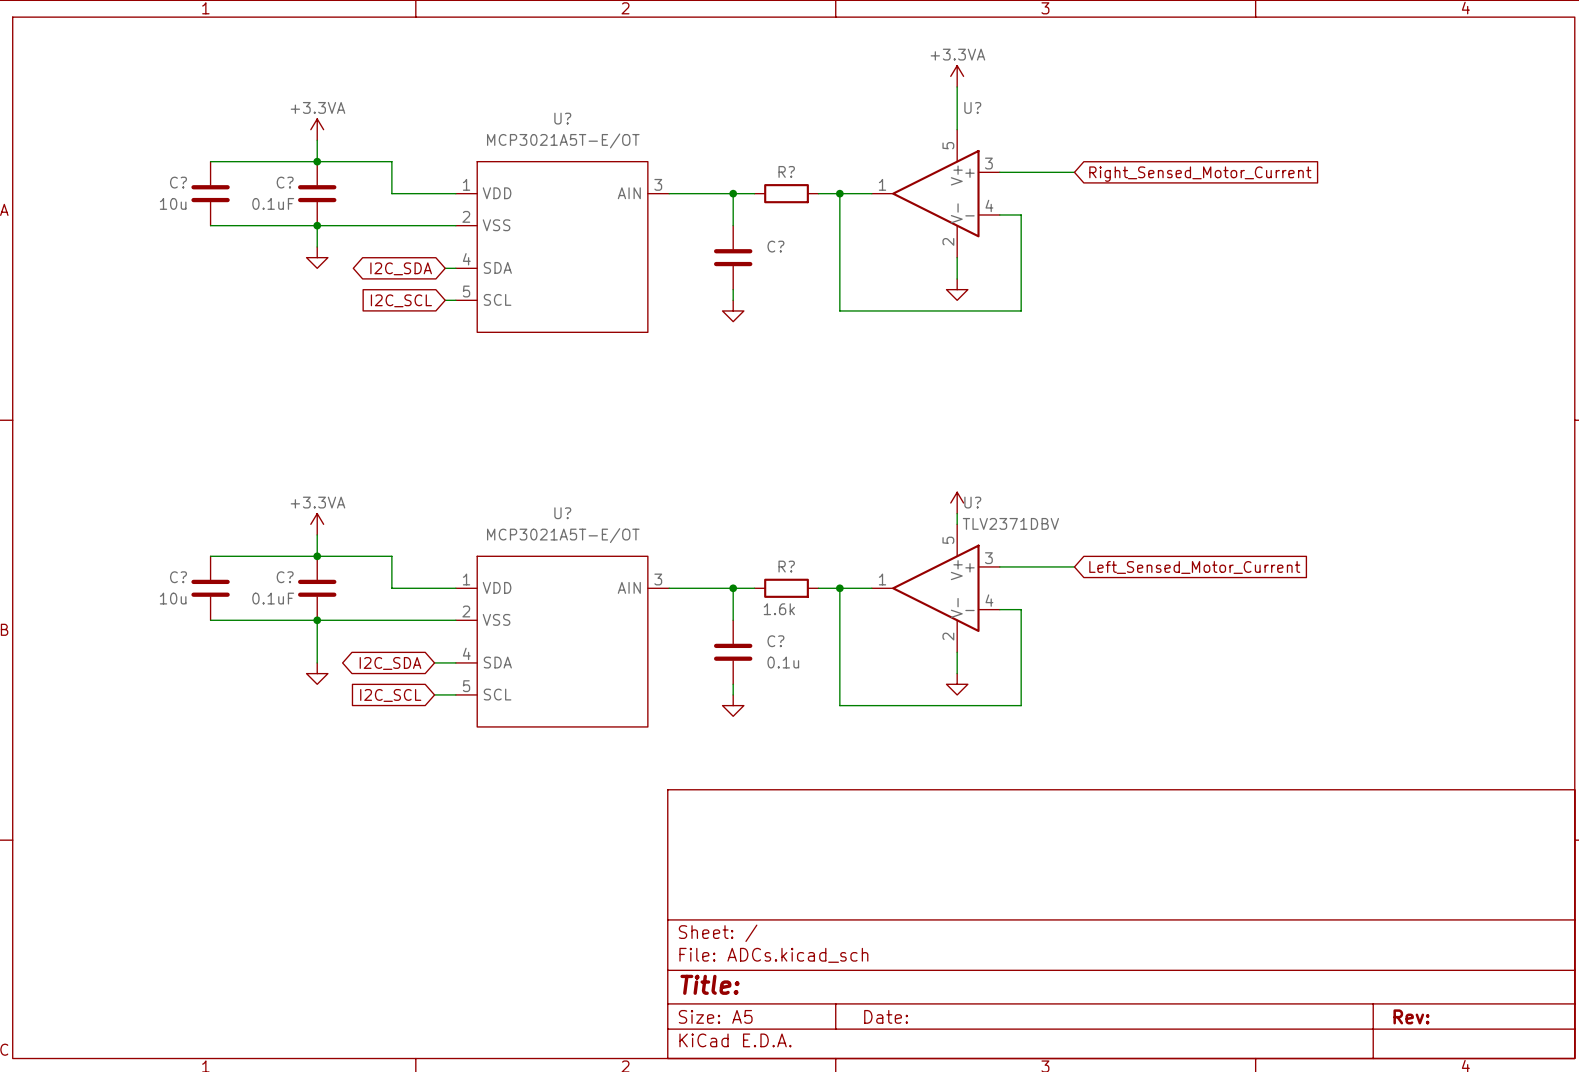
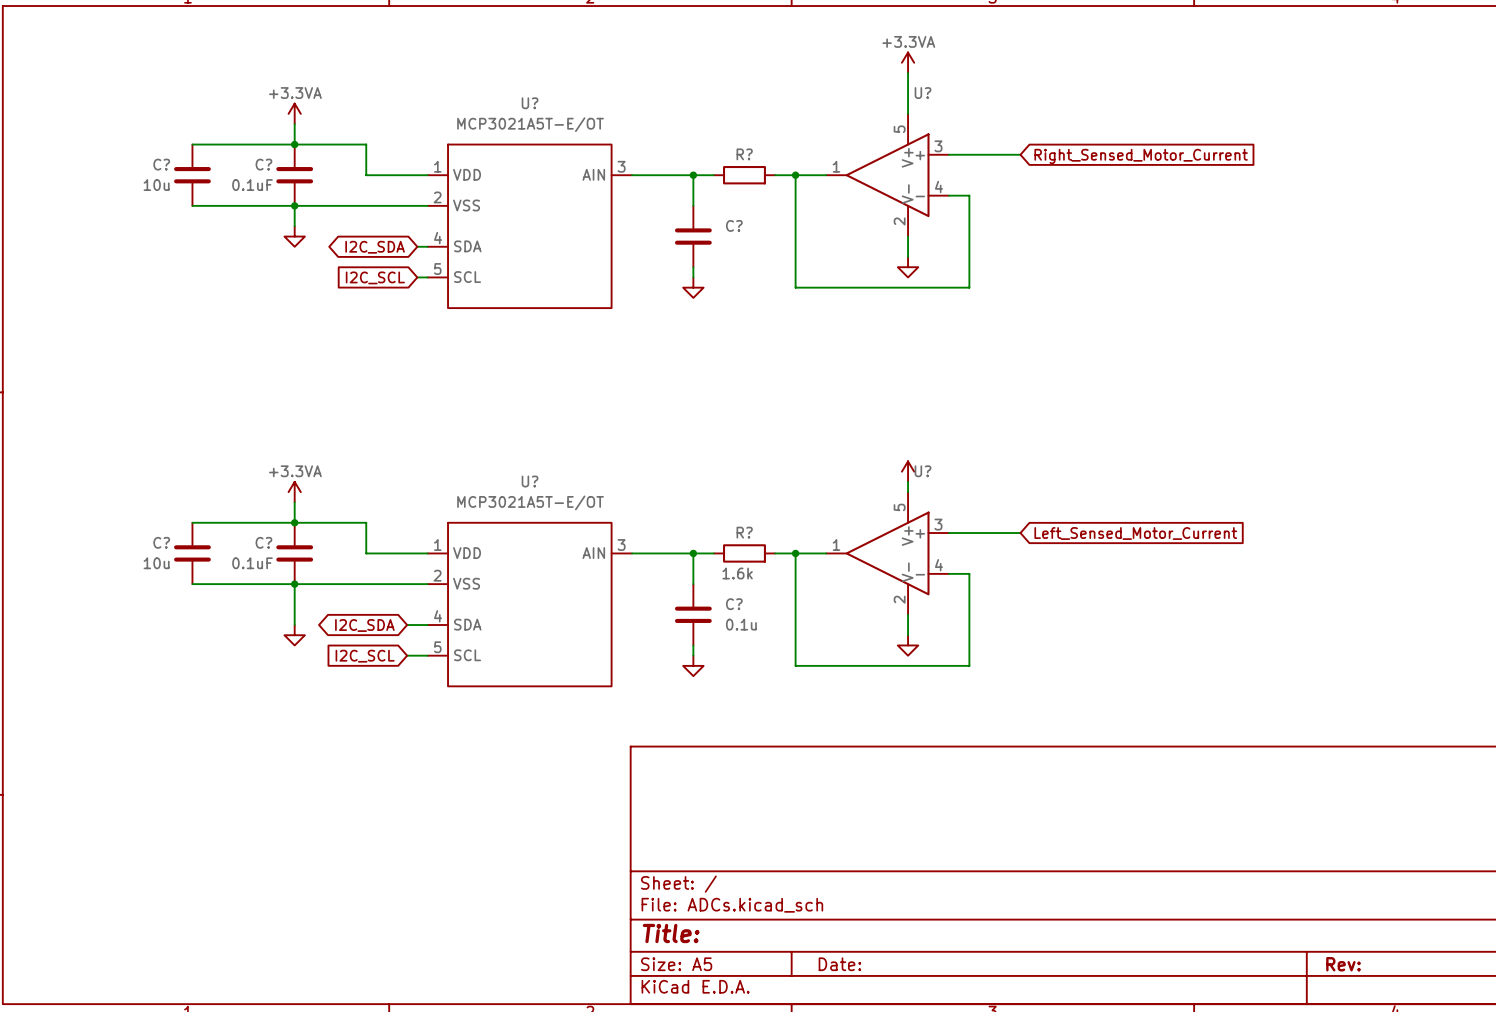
U? value: TLV2371DBV (1010, 523) -> none

